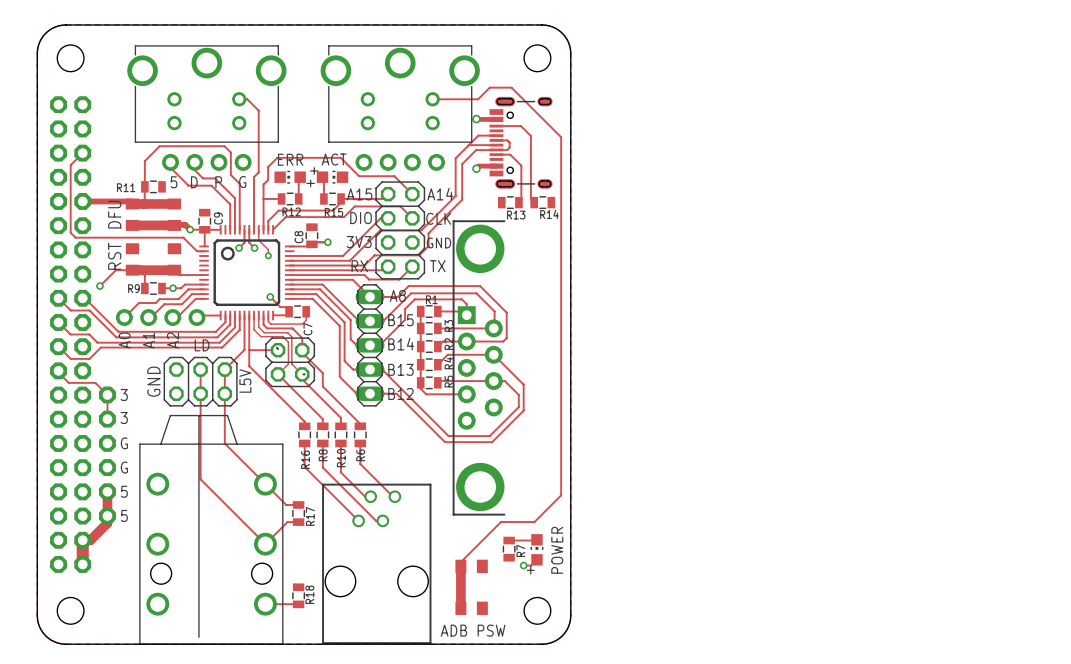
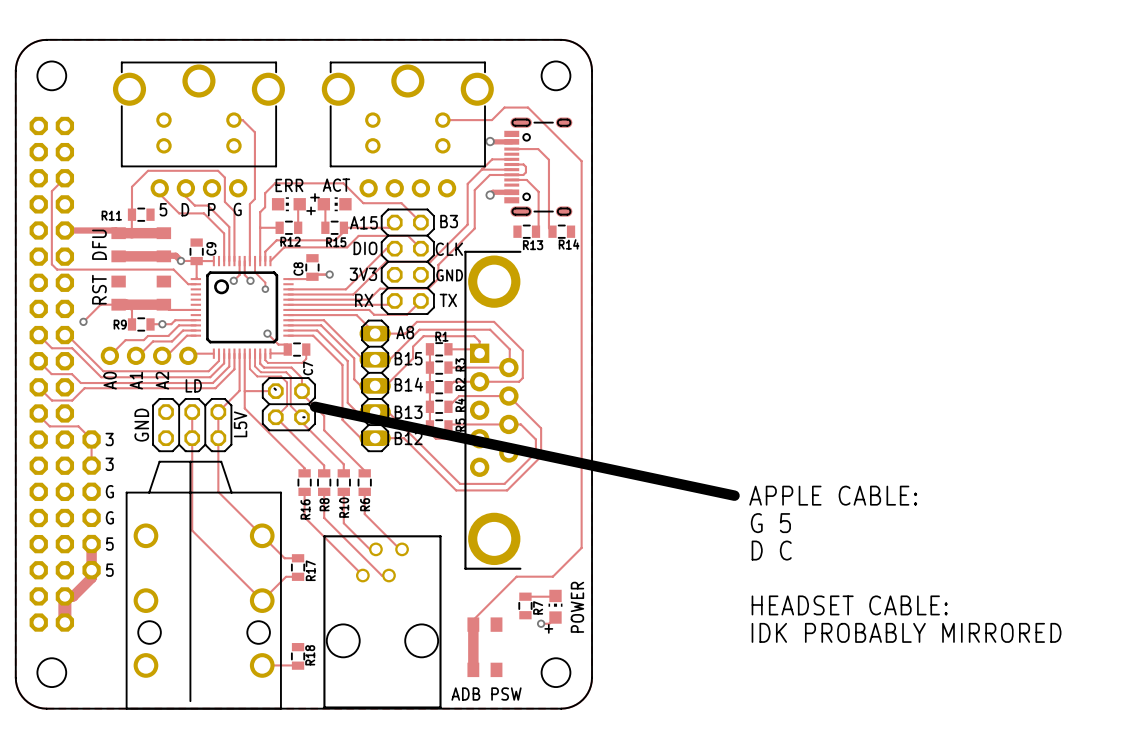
text: A14 (440, 194) -> B3 (449, 221)
line: none -> (315, 406) (734, 495)
text: none -> APPLE CABLE: (833, 495)
text: none -> G 5 (770, 523)
text: none -> D C (771, 550)
text: none -> HEADSET CABLE: (849, 605)
text: none -> IDK PROBABLY MIRRORED (906, 632)

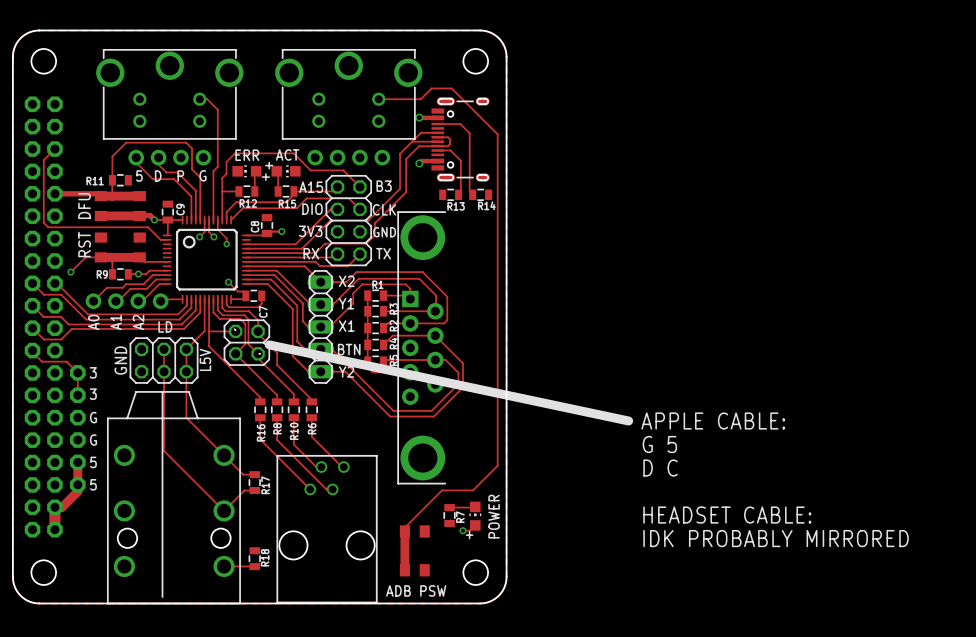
text: A8 (405, 332) -> X2 (346, 281)
text: B15 (408, 358) -> Y1 (346, 303)
text: B14 (408, 384) -> X1 (346, 326)
text: B13 (408, 412) -> BTN (349, 349)
text: B12 (408, 438) -> Y2 (346, 371)

